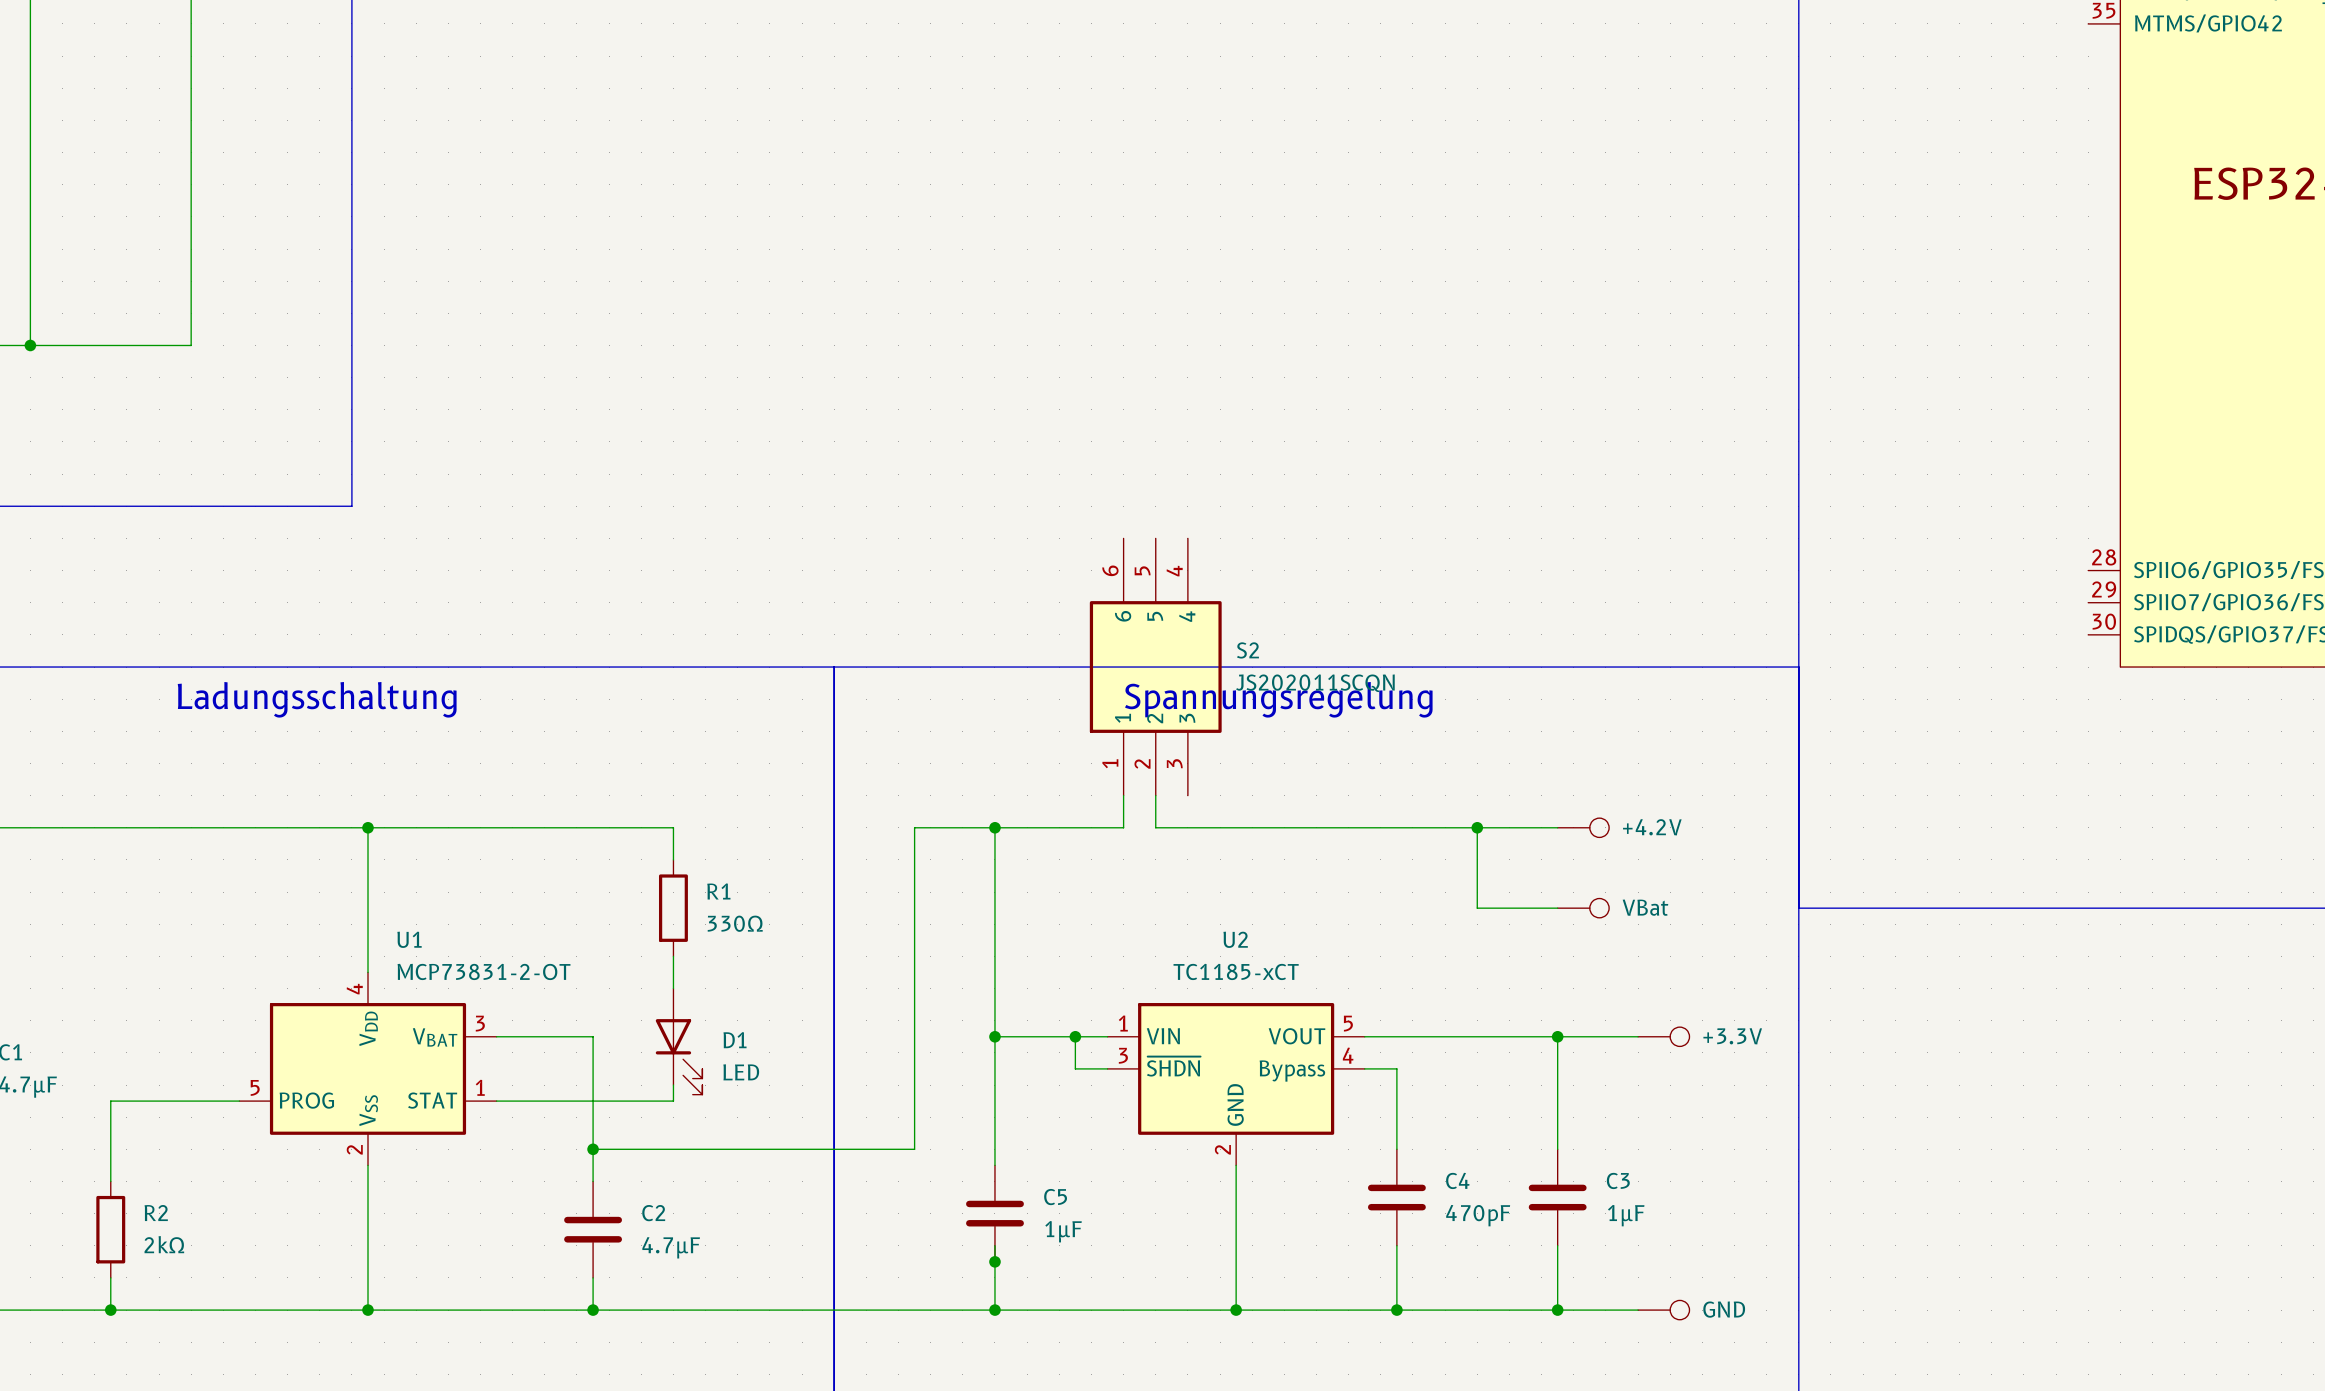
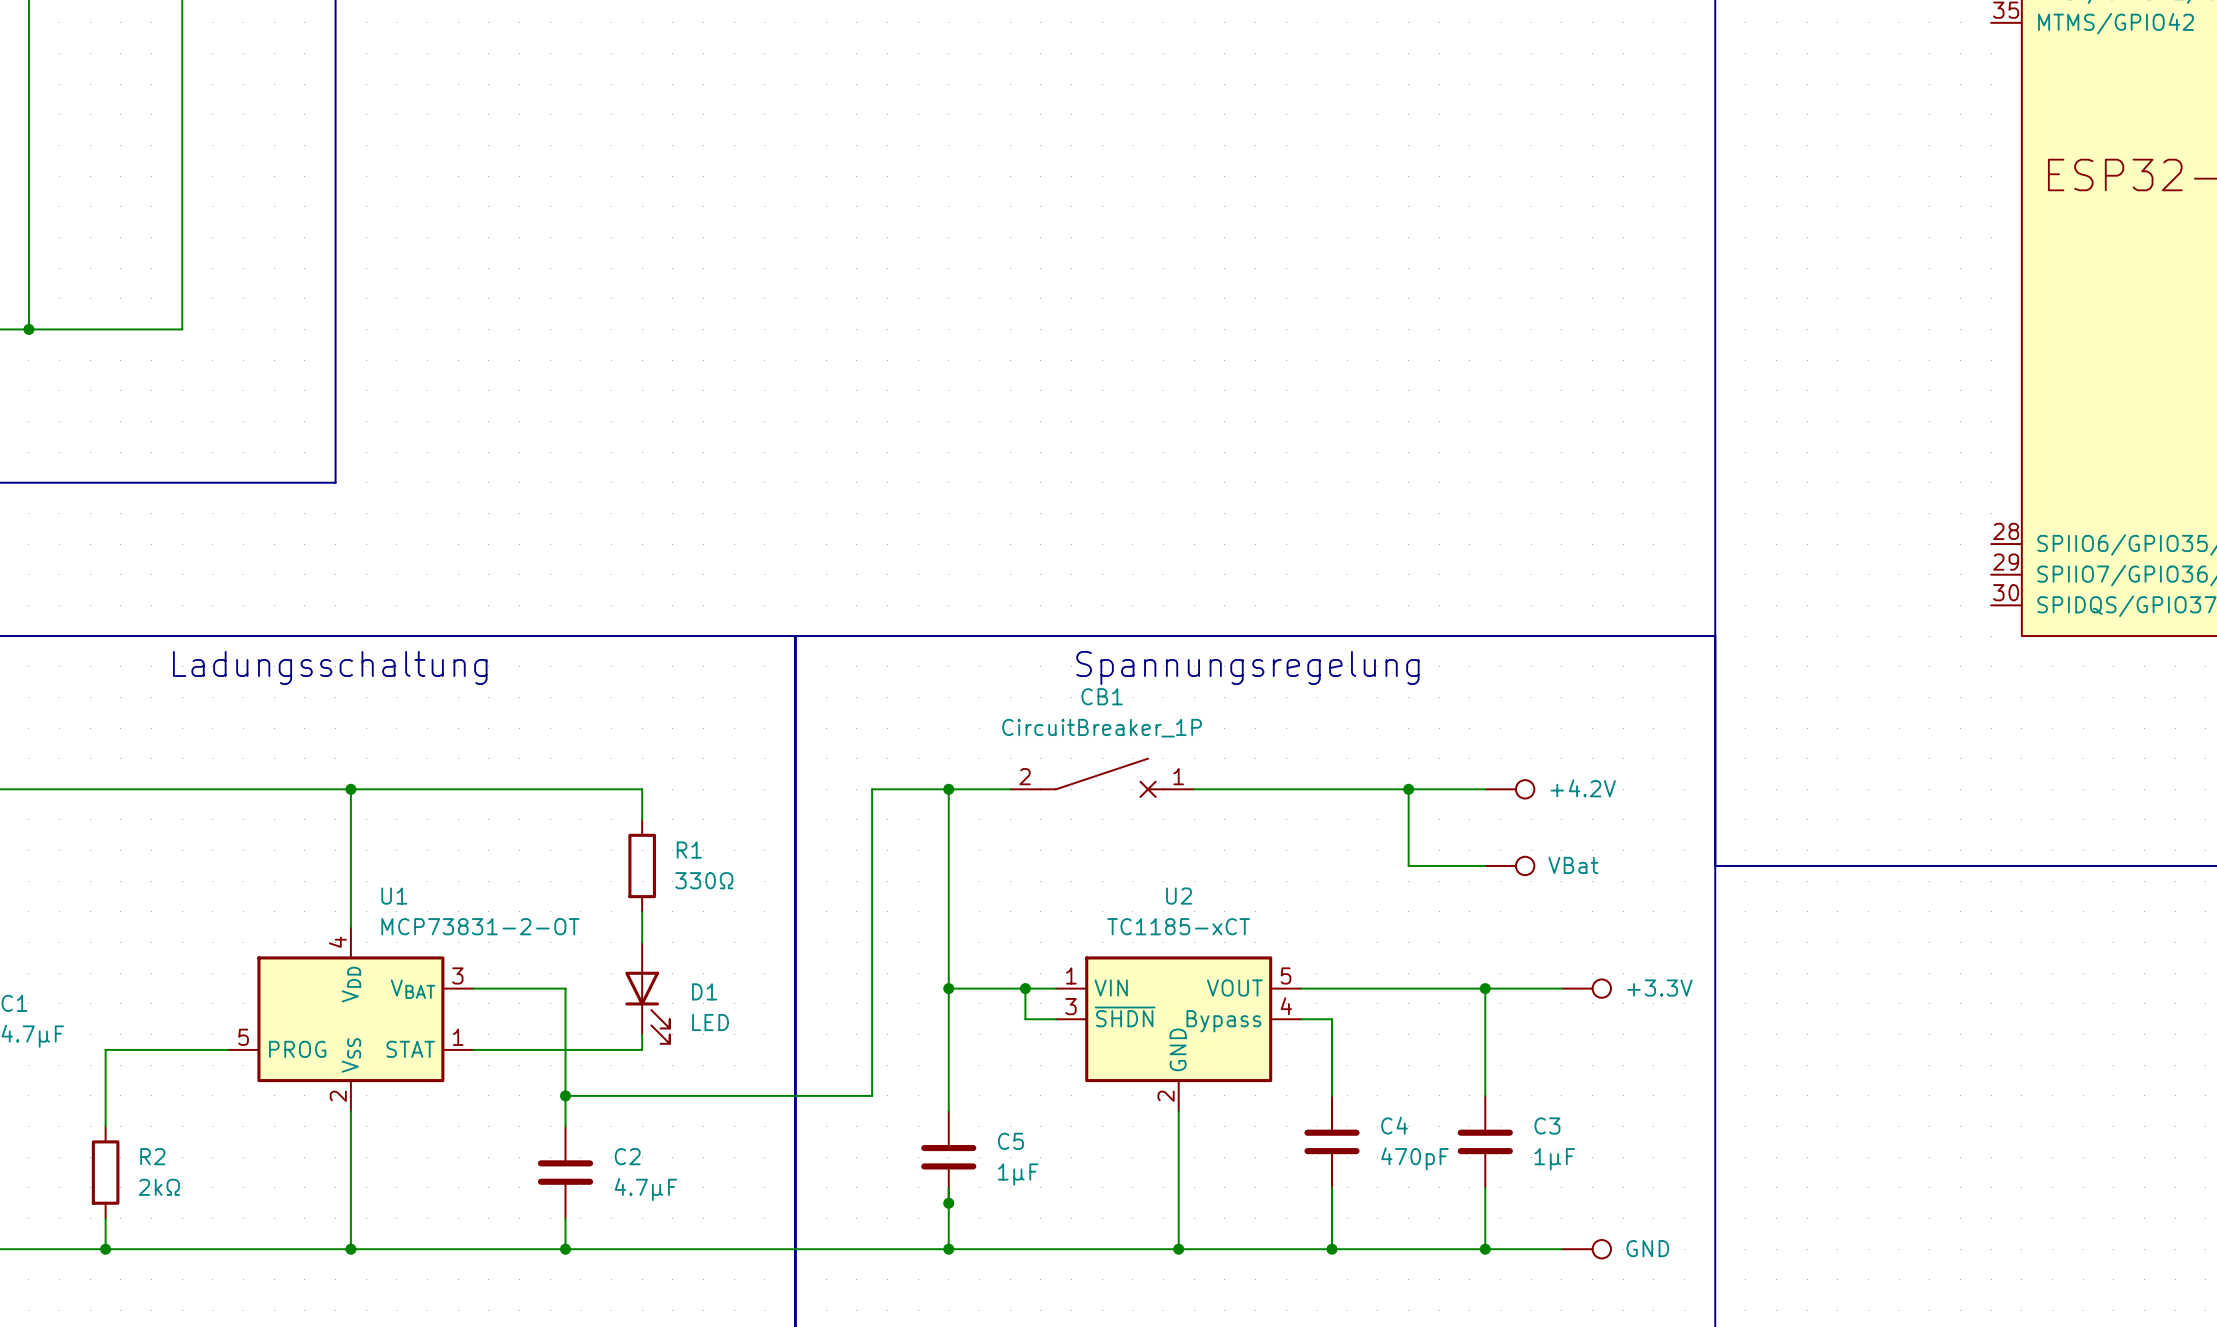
S2: JS202011SCQN (1155, 667) -> none
wire: (1123, 795) (1123, 827) (1059, 827) -> none
wire: (1155, 795) (1155, 827) (1252, 827) -> none
CB1: none -> CircuitBreaker_1P (1102, 777)

